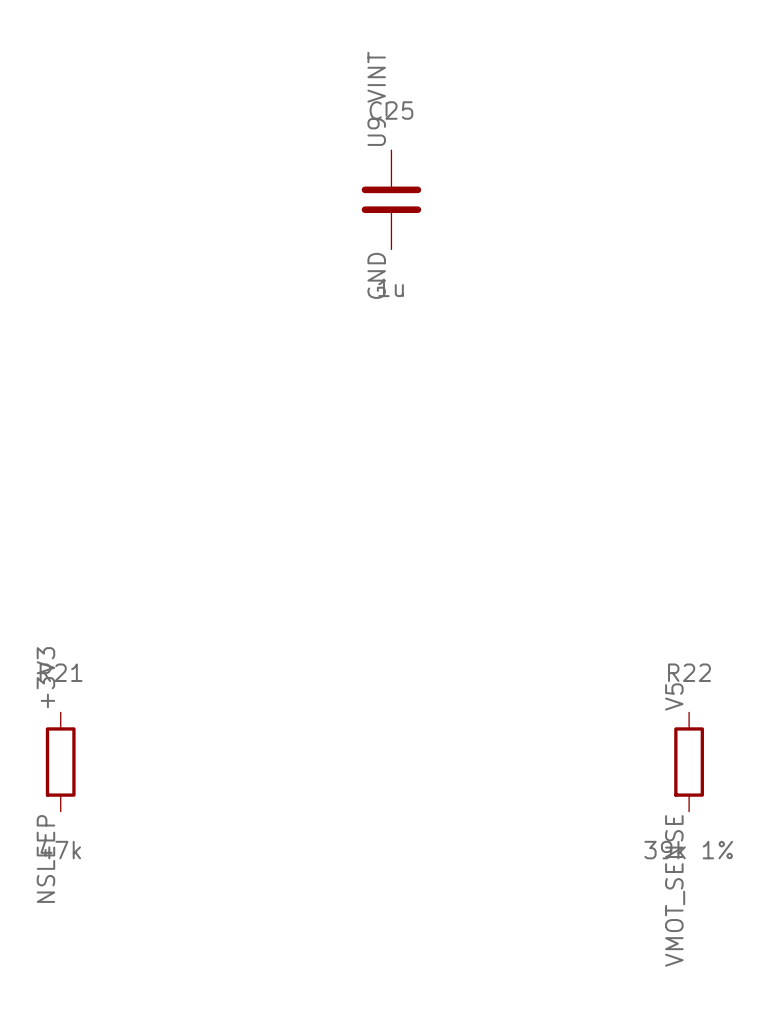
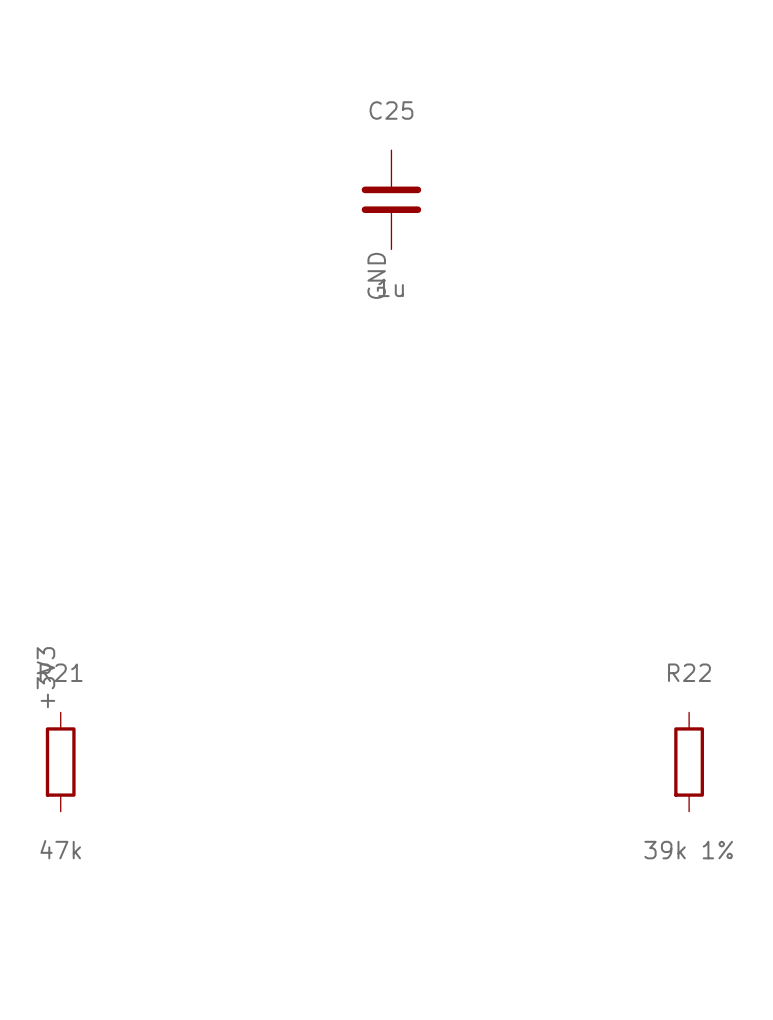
label: U9_VINT (377, 98) -> none
label: V5 (674, 696) -> none
label: NSLEEP (45, 859) -> none
label: VMOT_SENSE (675, 890) -> none

